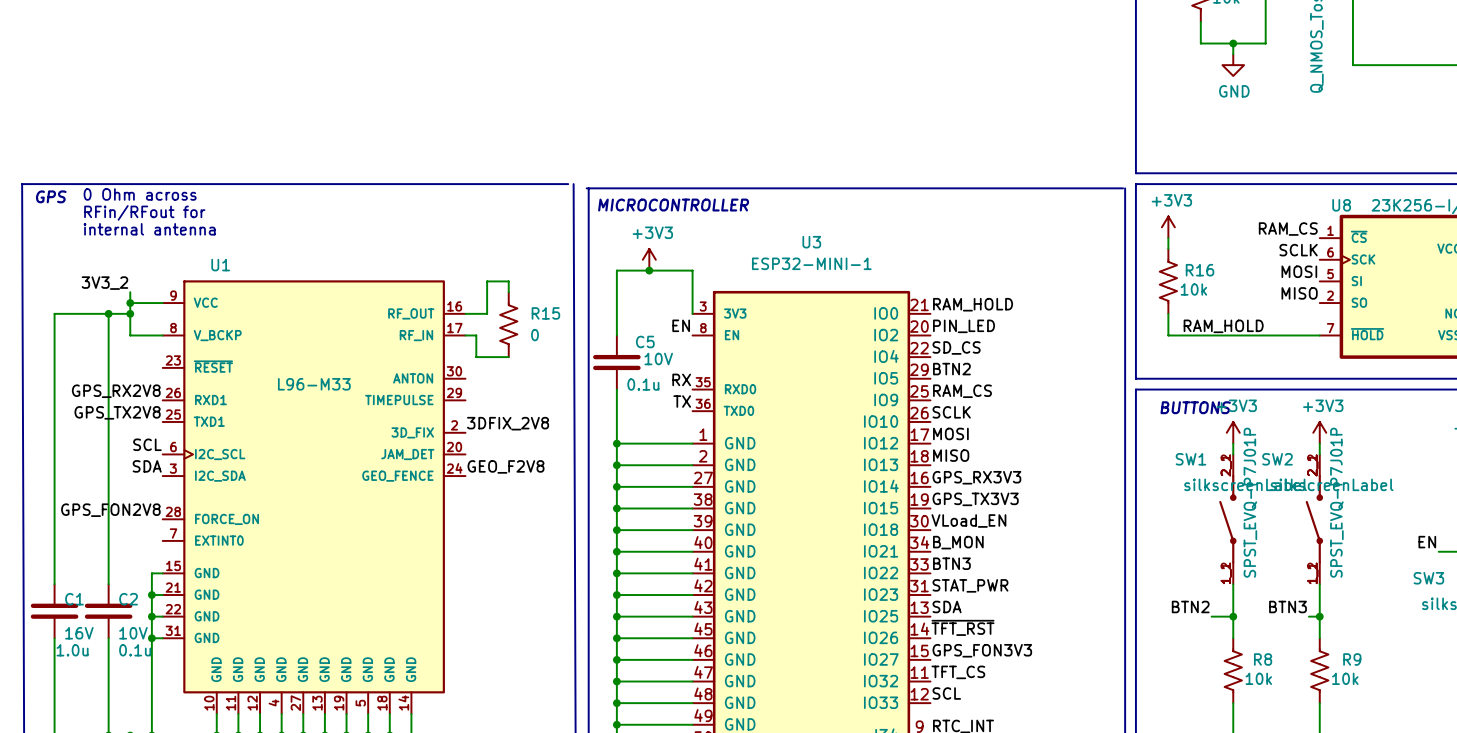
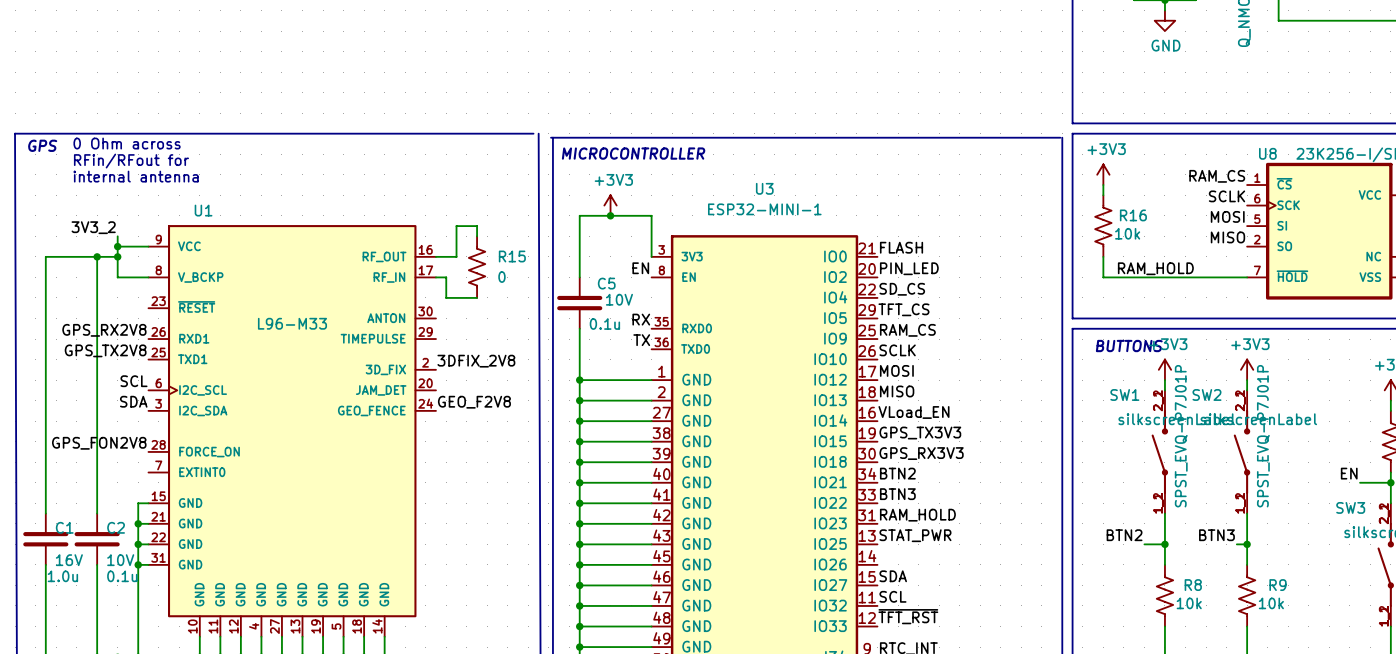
label: RAM_HOLD (973, 304) -> FLASH (901, 247)
label: BTN2 (951, 369) -> TFT_CS (903, 309)
label: GPS_RX3V3 (976, 477) -> VLoad_EN (913, 412)
label: VLoad_EN (968, 520) -> GPS_RX3V3 (921, 453)
label: B_MON (958, 542) -> BTN2 (897, 473)
label: STAT_PWR (970, 585) -> RAM_HOLD (917, 515)
label: SDA (947, 606) -> STAT_PWR (915, 535)
label: ~{TFT_RST} (963, 627) -> none
label: GPS_FON3V3 (982, 650) -> SDA (893, 576)
label: TFT_CS (958, 672) -> SCL (892, 596)
label: SCL (946, 693) -> ~{TFT_RST} (908, 616)

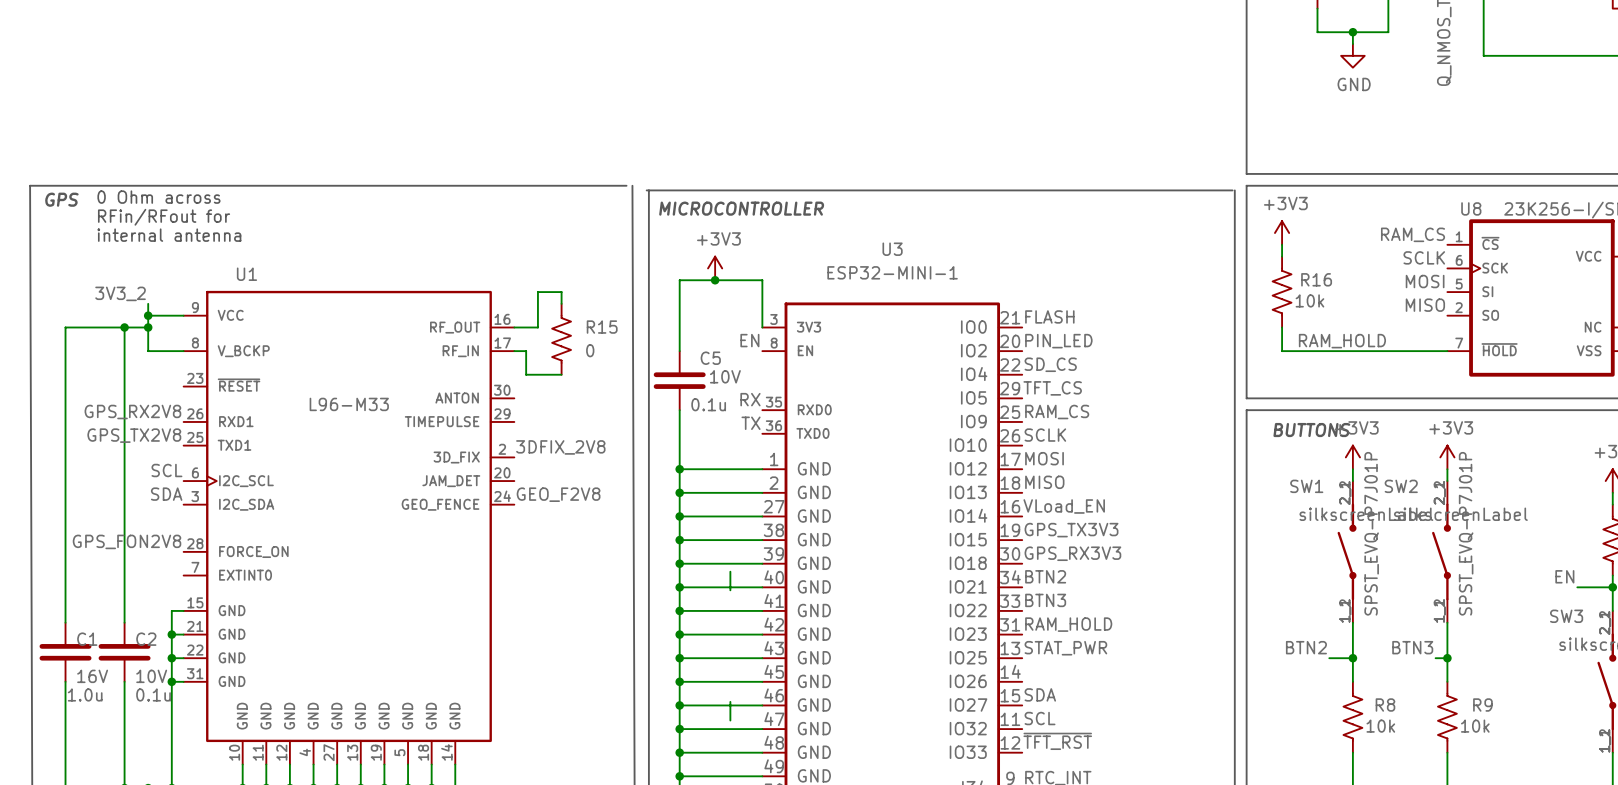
wire: none -> (730, 571) (730, 590)
wire: none -> (730, 701) (730, 720)

